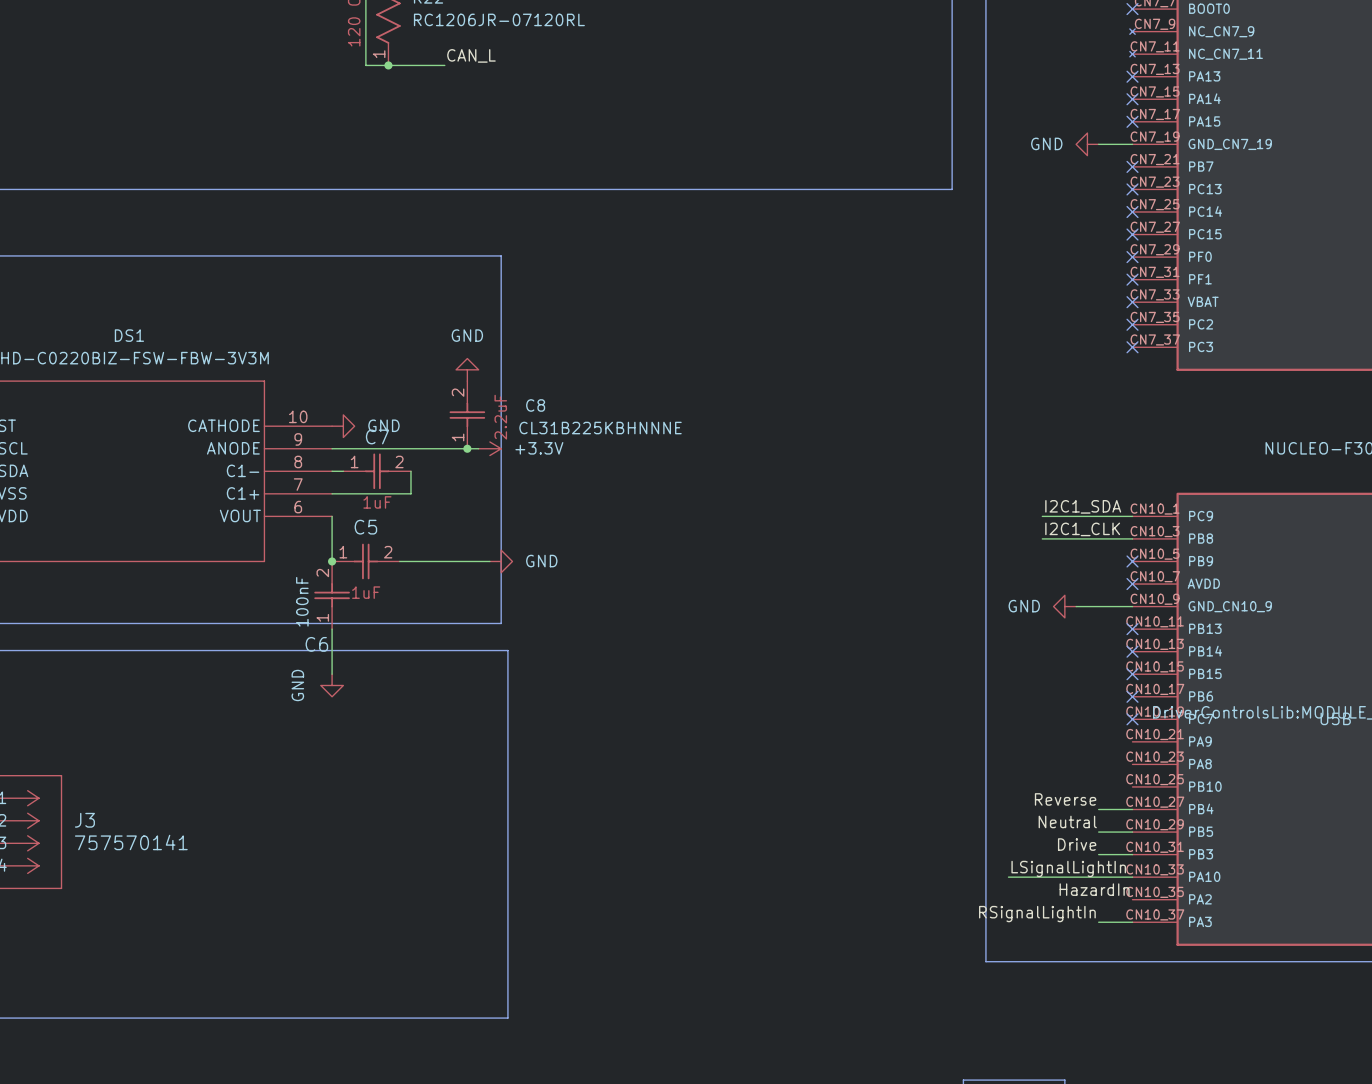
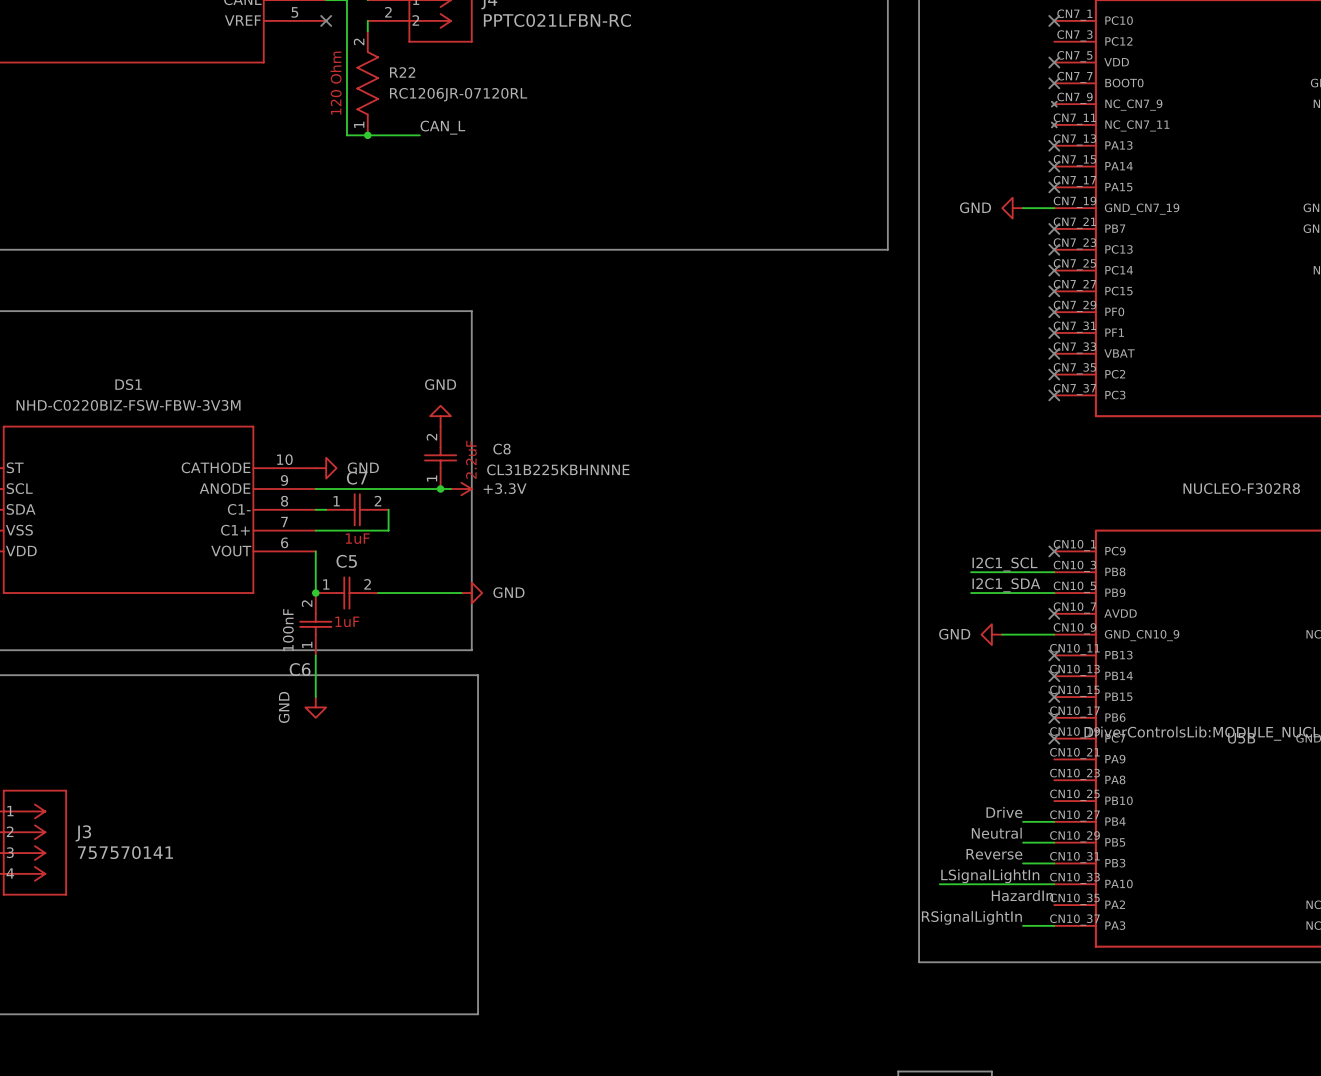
label position: I2C1_SDA (1083, 506) -> I2C1_SDA (1006, 585)
wire: (1042, 516) (1132, 516) -> (971, 593) (1054, 593)
label: I2C1_CLK (1082, 529) -> I2C1_SCL (1004, 564)
no-connect mark position: (1132, 561) -> (1054, 551)
label: Reverse (1065, 799) -> Drive (1004, 812)
label: Drive (1077, 844) -> Reverse (994, 854)

